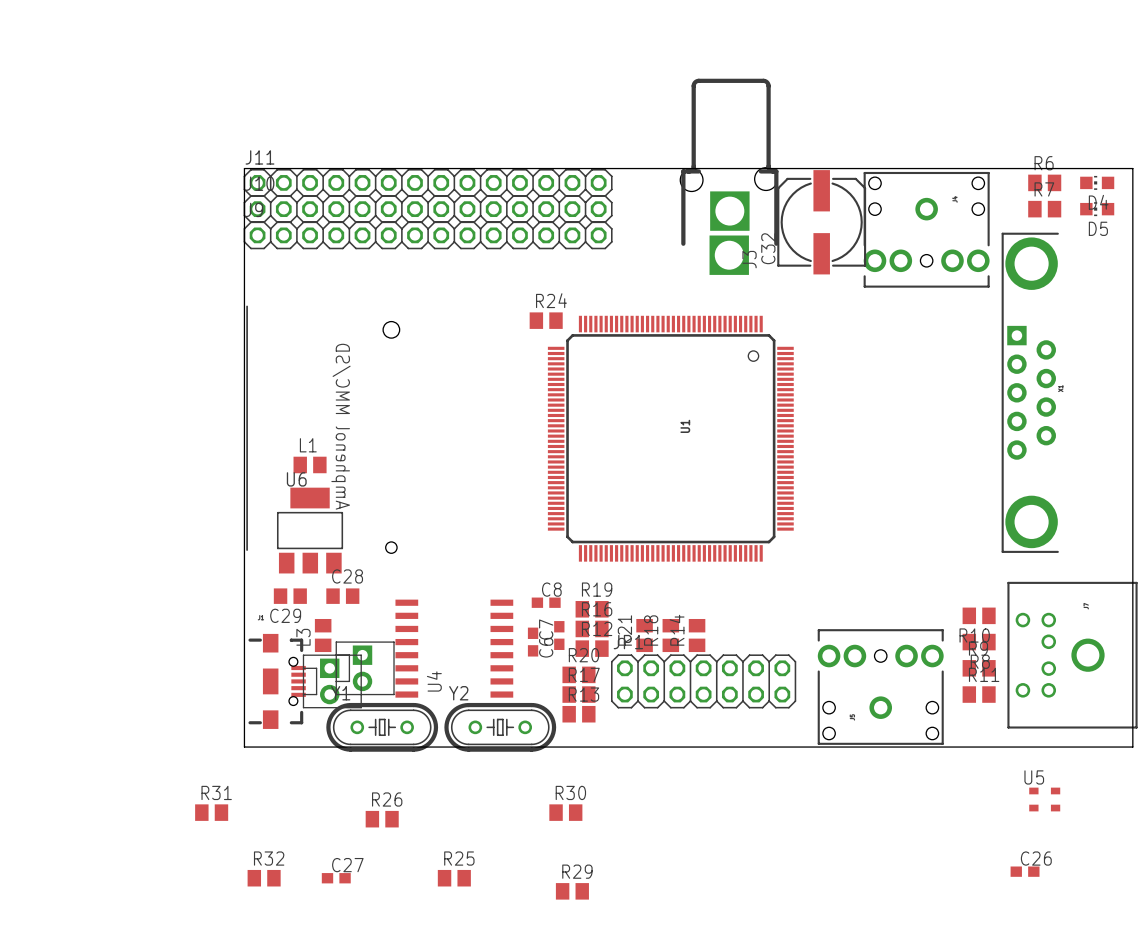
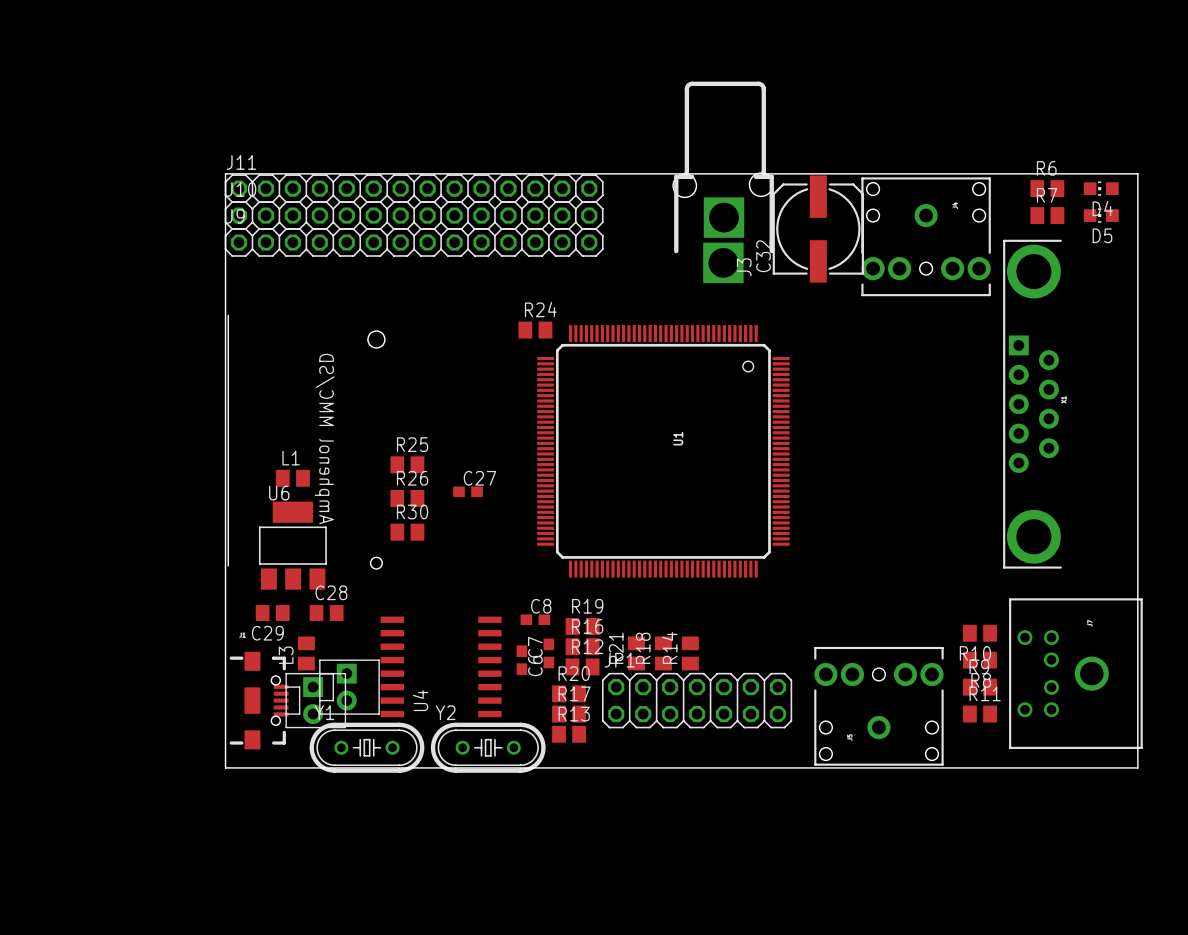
U5: (1044, 799) -> none
R31: (211, 812) -> none
R30 position: (565, 812) -> (407, 532)
R26 position: (382, 819) -> (407, 498)
C26: (1025, 871) -> none
R32: (264, 878) -> none
C27 position: (336, 878) -> (468, 491)
R25 position: (454, 878) -> (407, 464)
R29: (572, 891) -> none

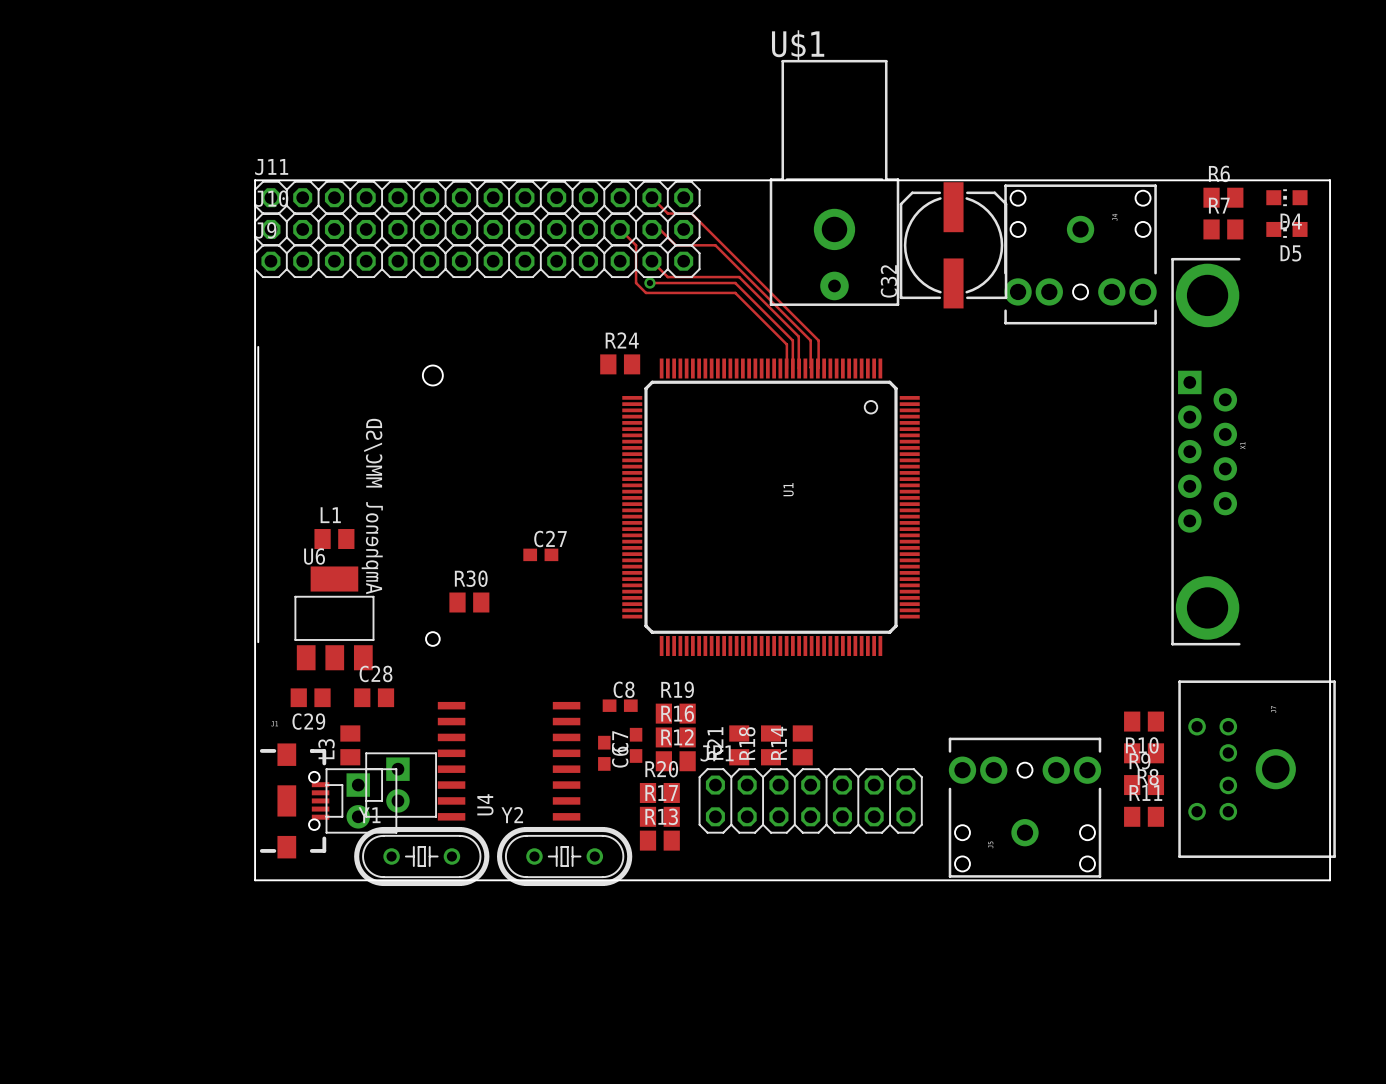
U$1: none -> (834, 182)
J3: (723, 182) -> none
track: none -> (651, 197) (667, 213) (691, 213) (818, 340) (817, 368)
track: none -> (620, 229) (636, 245) (636, 283) (645, 292) (735, 292) (786, 344) (786, 368)
track: none -> (651, 229) (659, 229) (675, 245) (715, 245) (810, 340) (811, 368)
track: none -> (651, 261) (667, 277) (739, 277) (798, 336) (799, 368)
track: none -> (649, 283) (735, 283) (792, 340) (792, 368)
via: none -> (649, 283)
R25: (407, 464) -> none
R26: (407, 498) -> none

